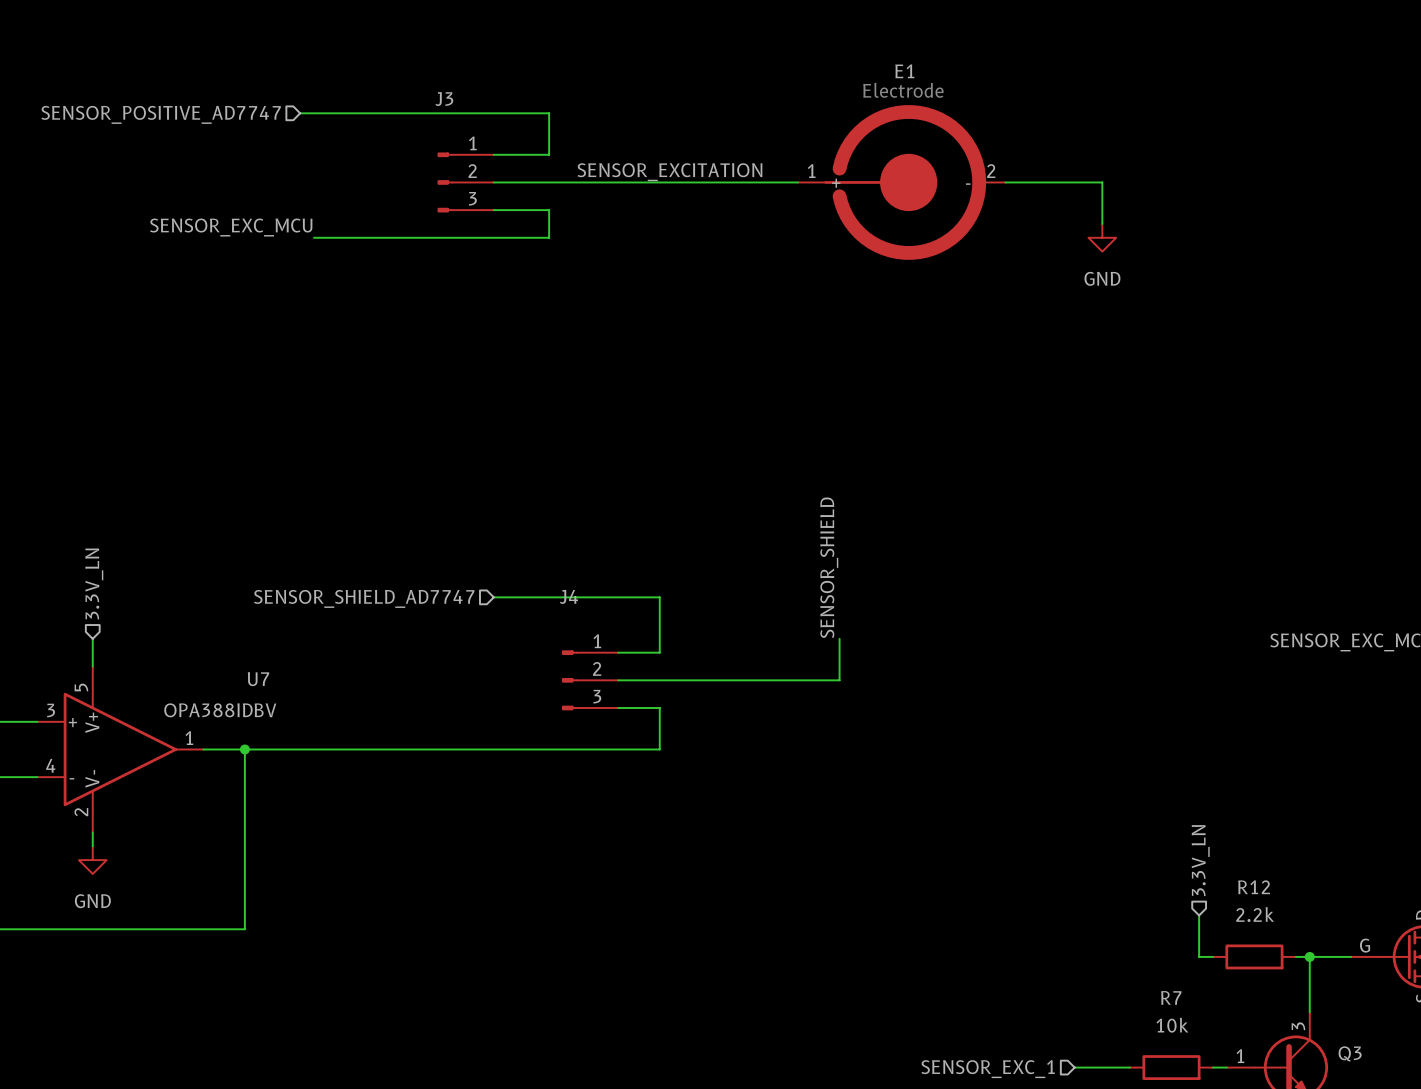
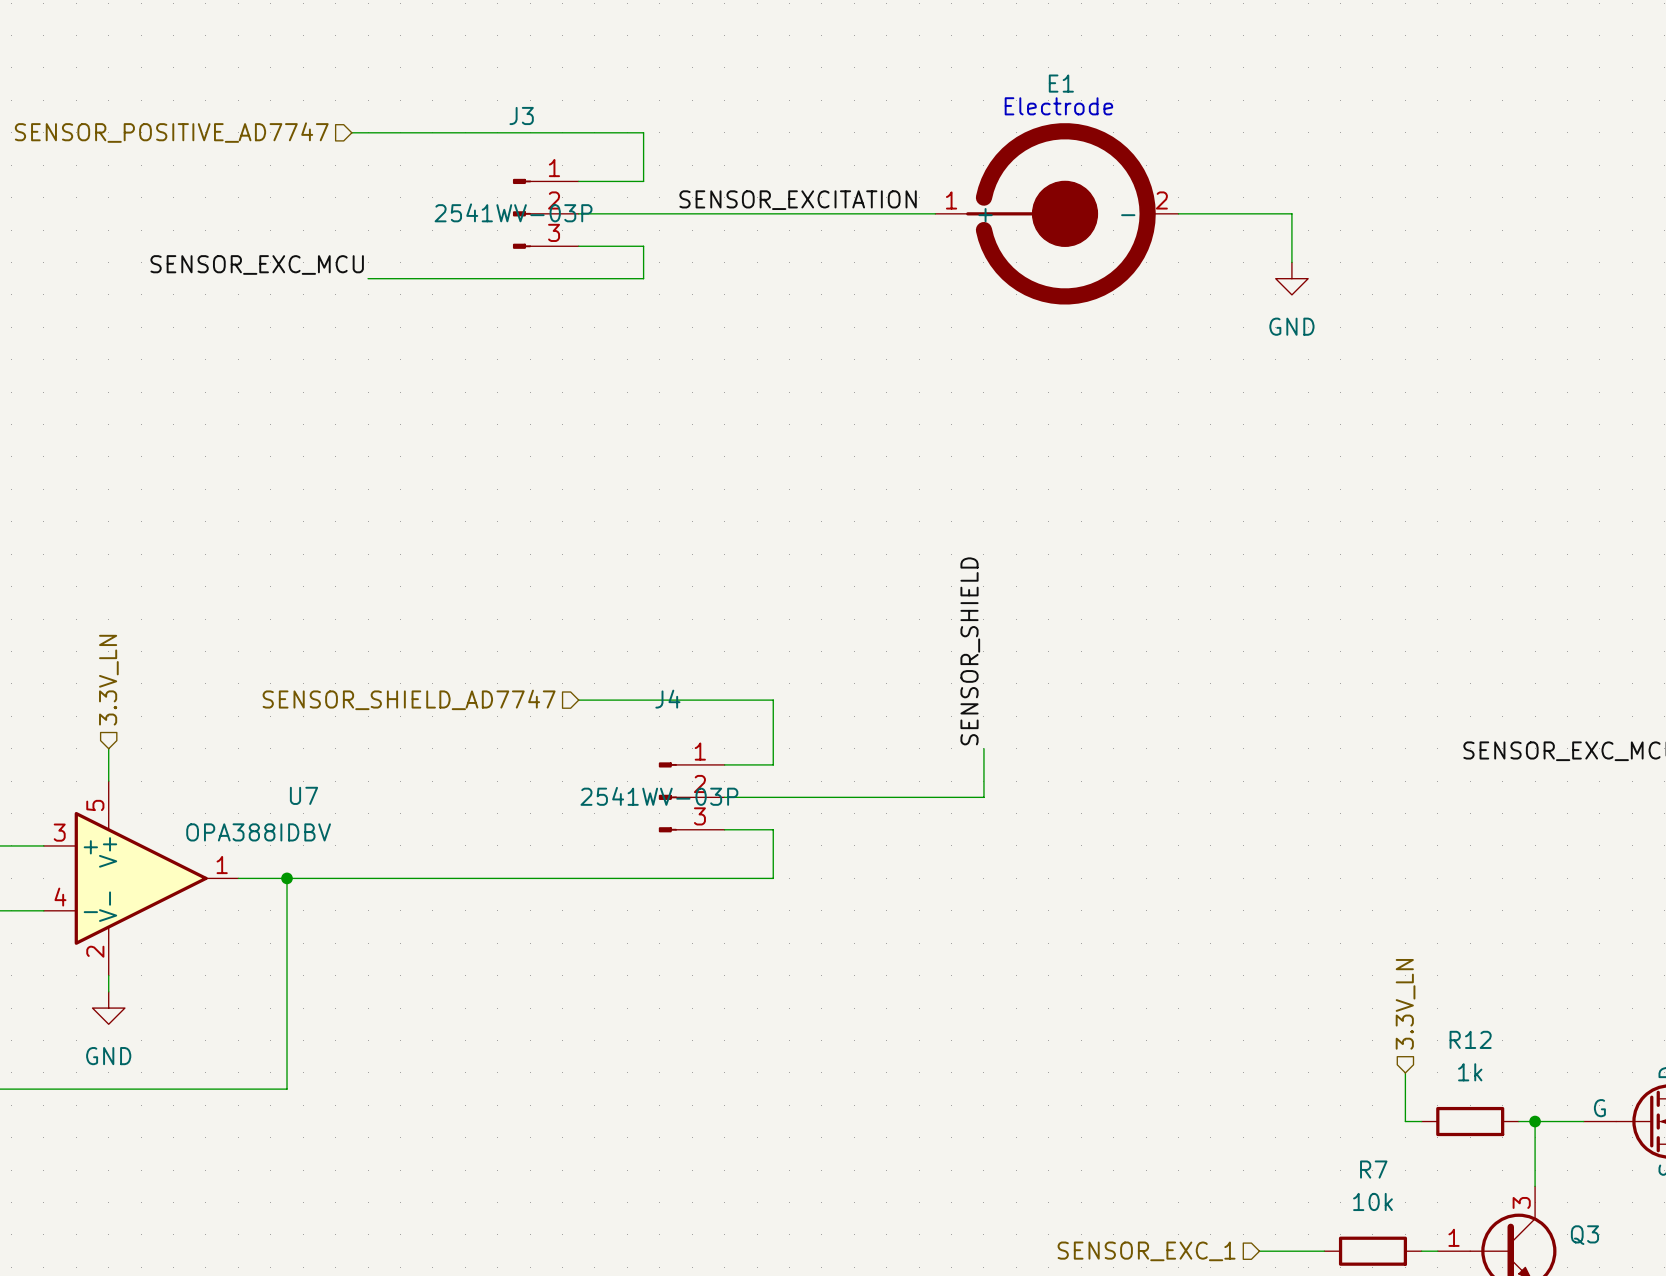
J3 text: none -> 2541WV-03P (513, 212)
J4 text: none -> 2541WV-03P (659, 796)
R12 value: 2.2k (1255, 914) -> 1k (1470, 1072)

